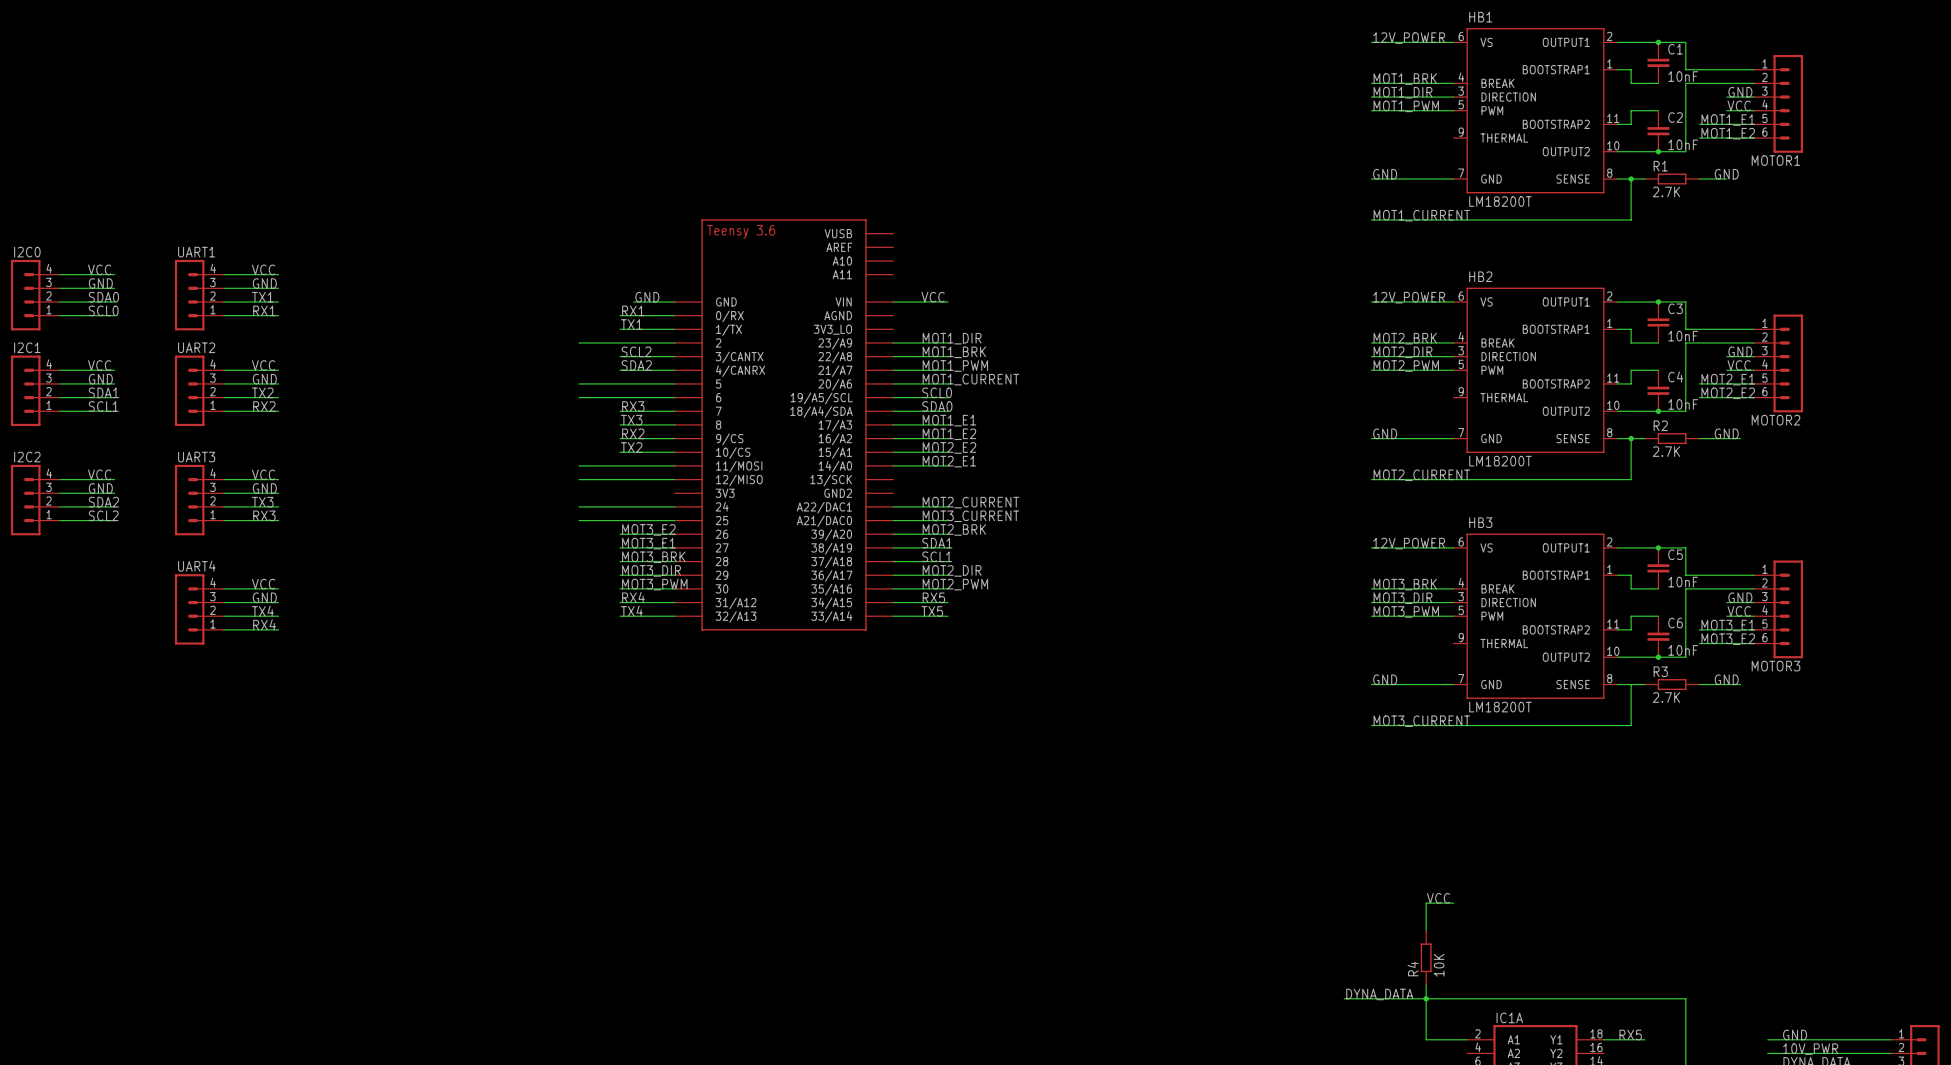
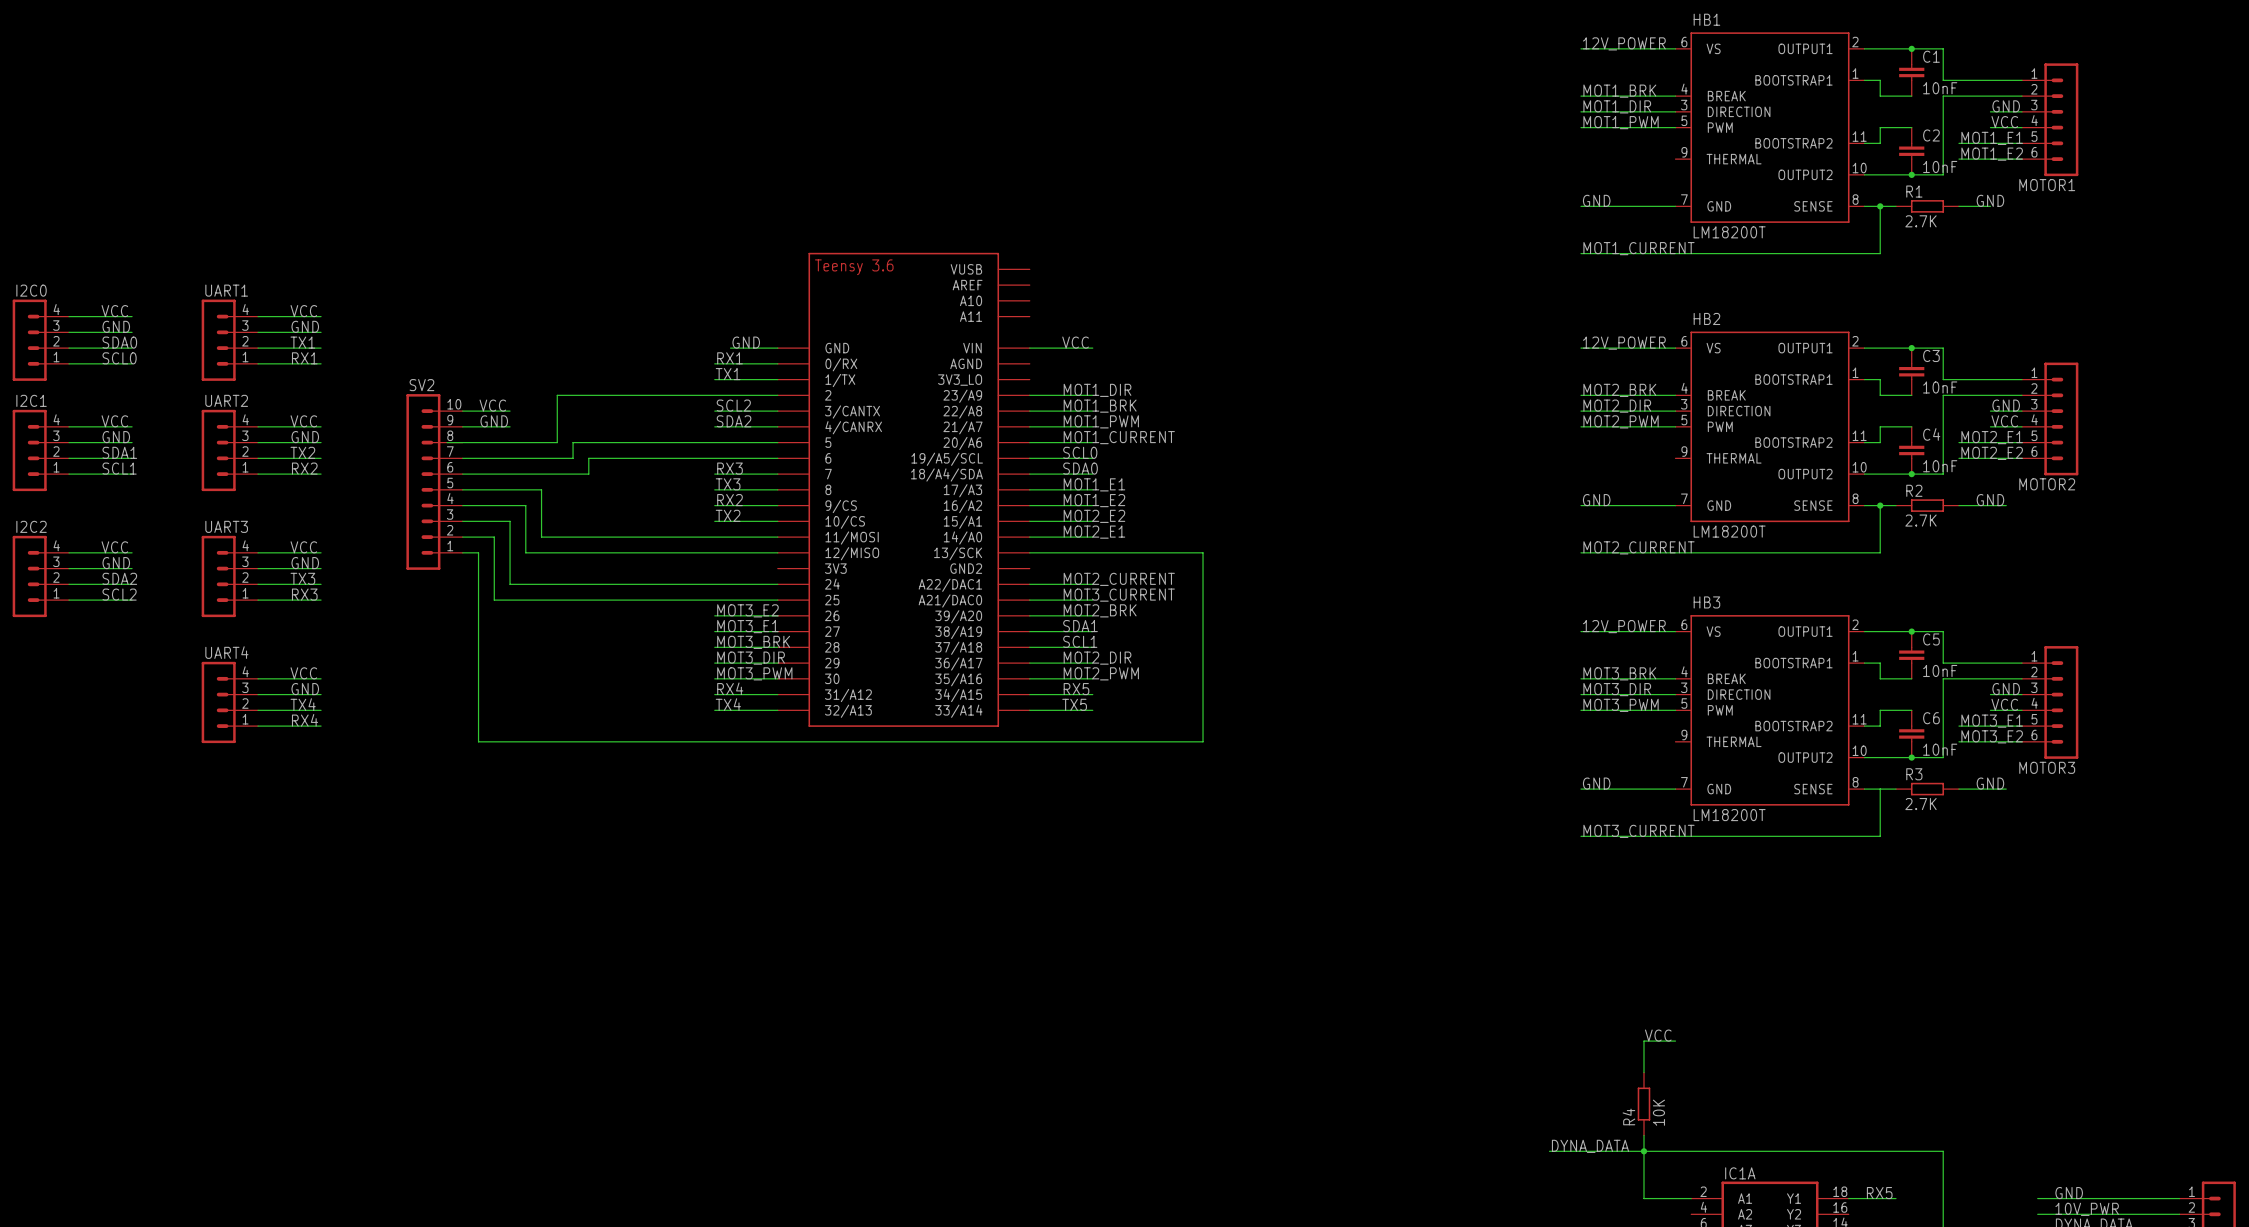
wire: none -> (667, 395) (557, 395) (557, 442) (447, 442)
label: none -> VCC (492, 405)
wire: none -> (462, 411) (510, 411)
label: none -> GND (494, 421)
wire: none -> (462, 426) (510, 426)
wire: none -> (667, 442) (573, 442) (573, 458) (462, 458)
wire: none -> (667, 458) (588, 458) (588, 474) (462, 474)
SV2: none -> (434, 481)
wire: none -> (462, 489) (541, 489) (541, 537) (667, 537)
wire: none -> (462, 505) (525, 505) (525, 552) (667, 552)
wire: none -> (462, 521) (510, 521) (510, 584) (667, 584)
wire: none -> (462, 537) (494, 537) (494, 600) (667, 600)
wire: none -> (462, 552) (478, 552) (478, 741) (1203, 741) (1203, 552) (1029, 552)

